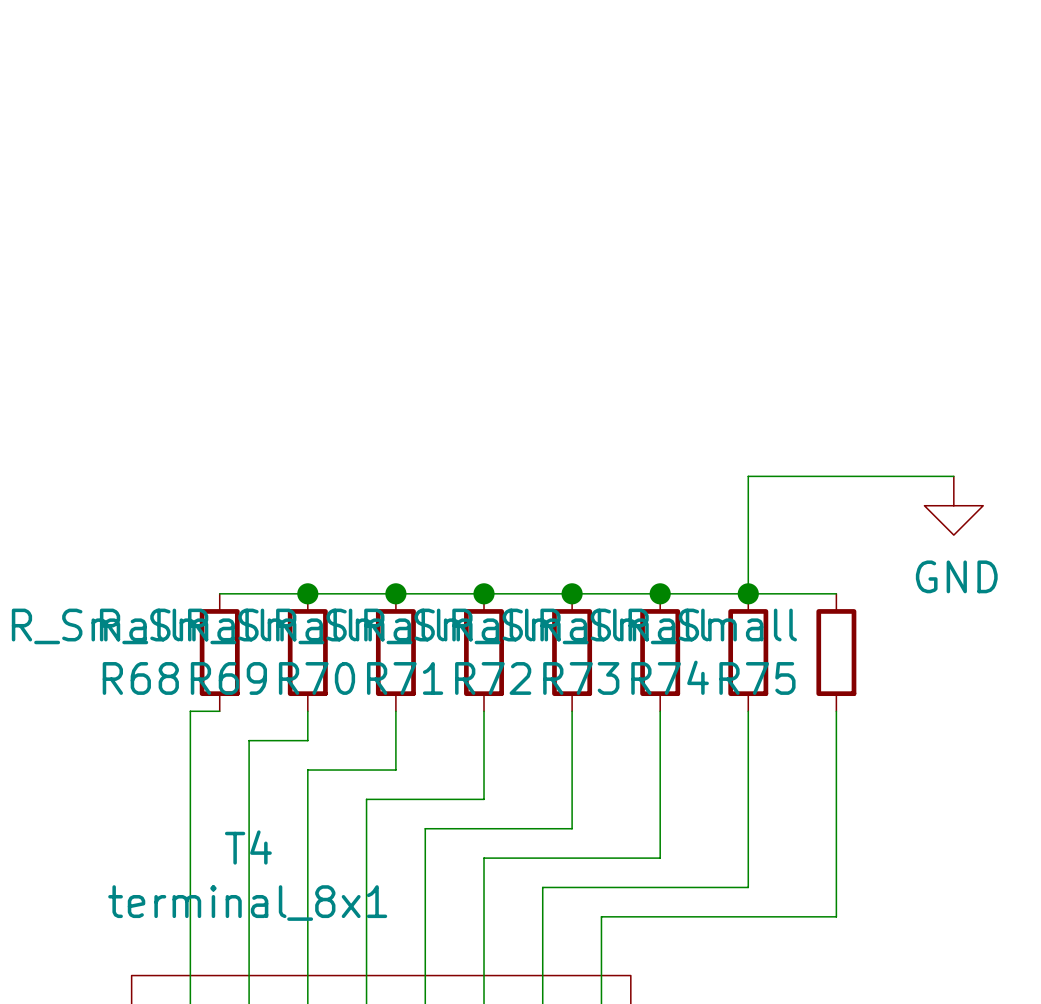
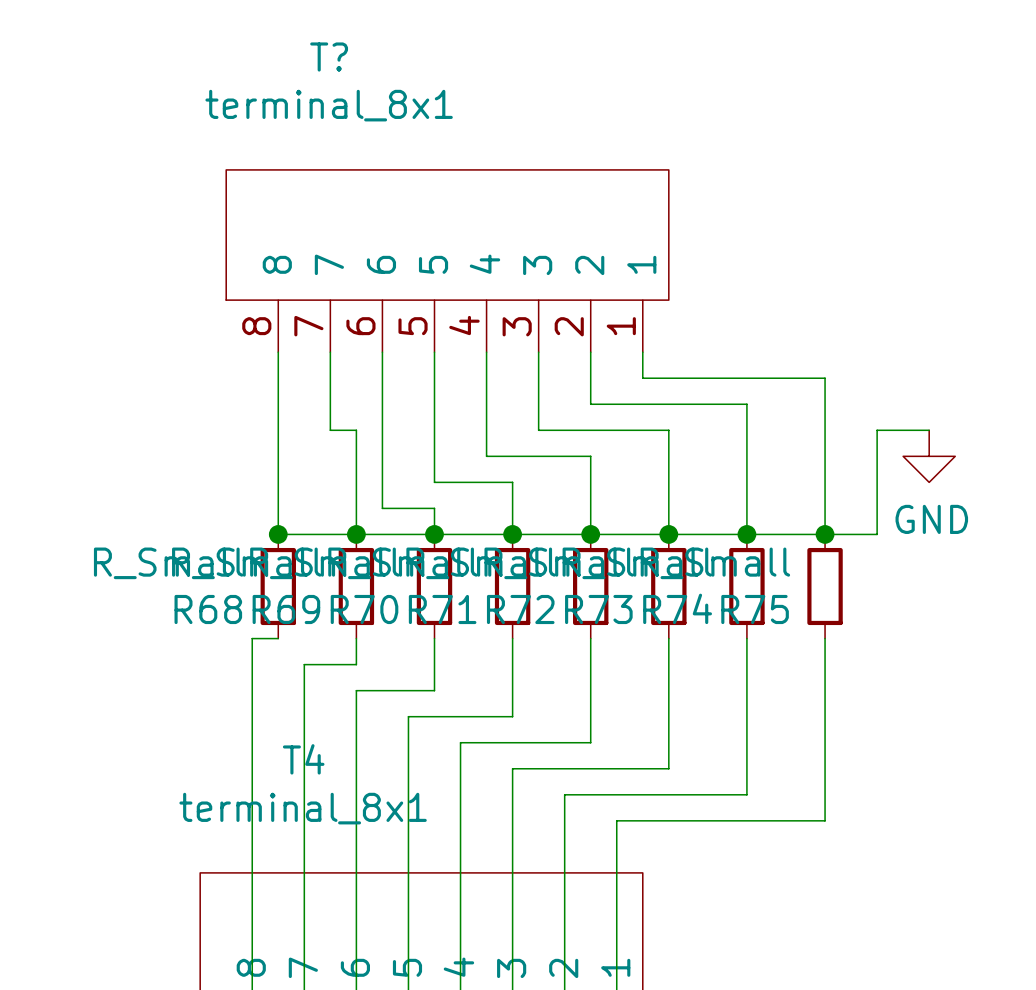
T?: none -> terminal_8x1 (447, 261)
wire: none -> (278, 352) (278, 534)
wire: none -> (330, 352) (330, 430) (356, 430) (356, 534)
wire: none -> (382, 352) (382, 508) (434, 508) (434, 534)
wire: none -> (434, 352) (434, 482) (512, 482) (512, 534)
wire: none -> (486, 352) (486, 456) (590, 456) (590, 534)
wire: none -> (538, 352) (538, 430) (668, 430) (668, 534)
wire: none -> (590, 352) (590, 404) (746, 404) (746, 430)
wire: (748, 476) (895, 476) -> (642, 352) (642, 378) (825, 378) (825, 534) (877, 534) (877, 430)
junction: none -> (278, 534)
junction: none -> (825, 534)

